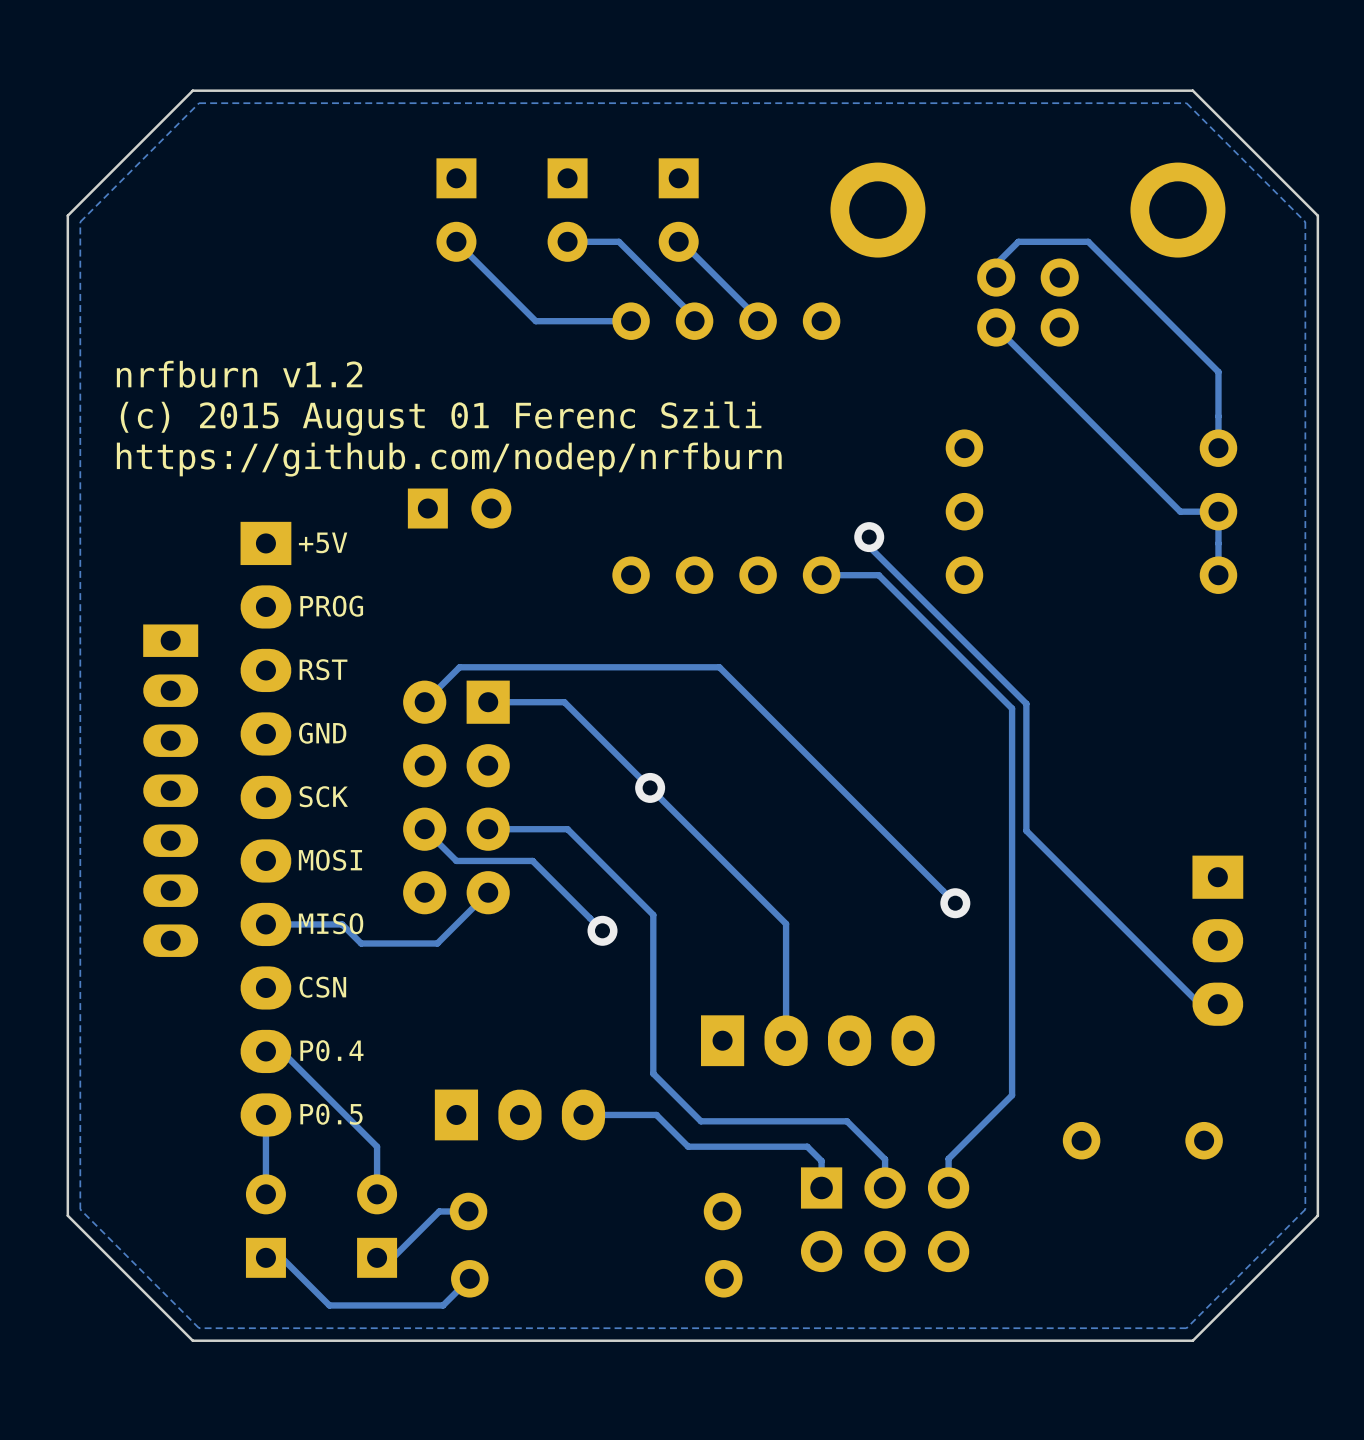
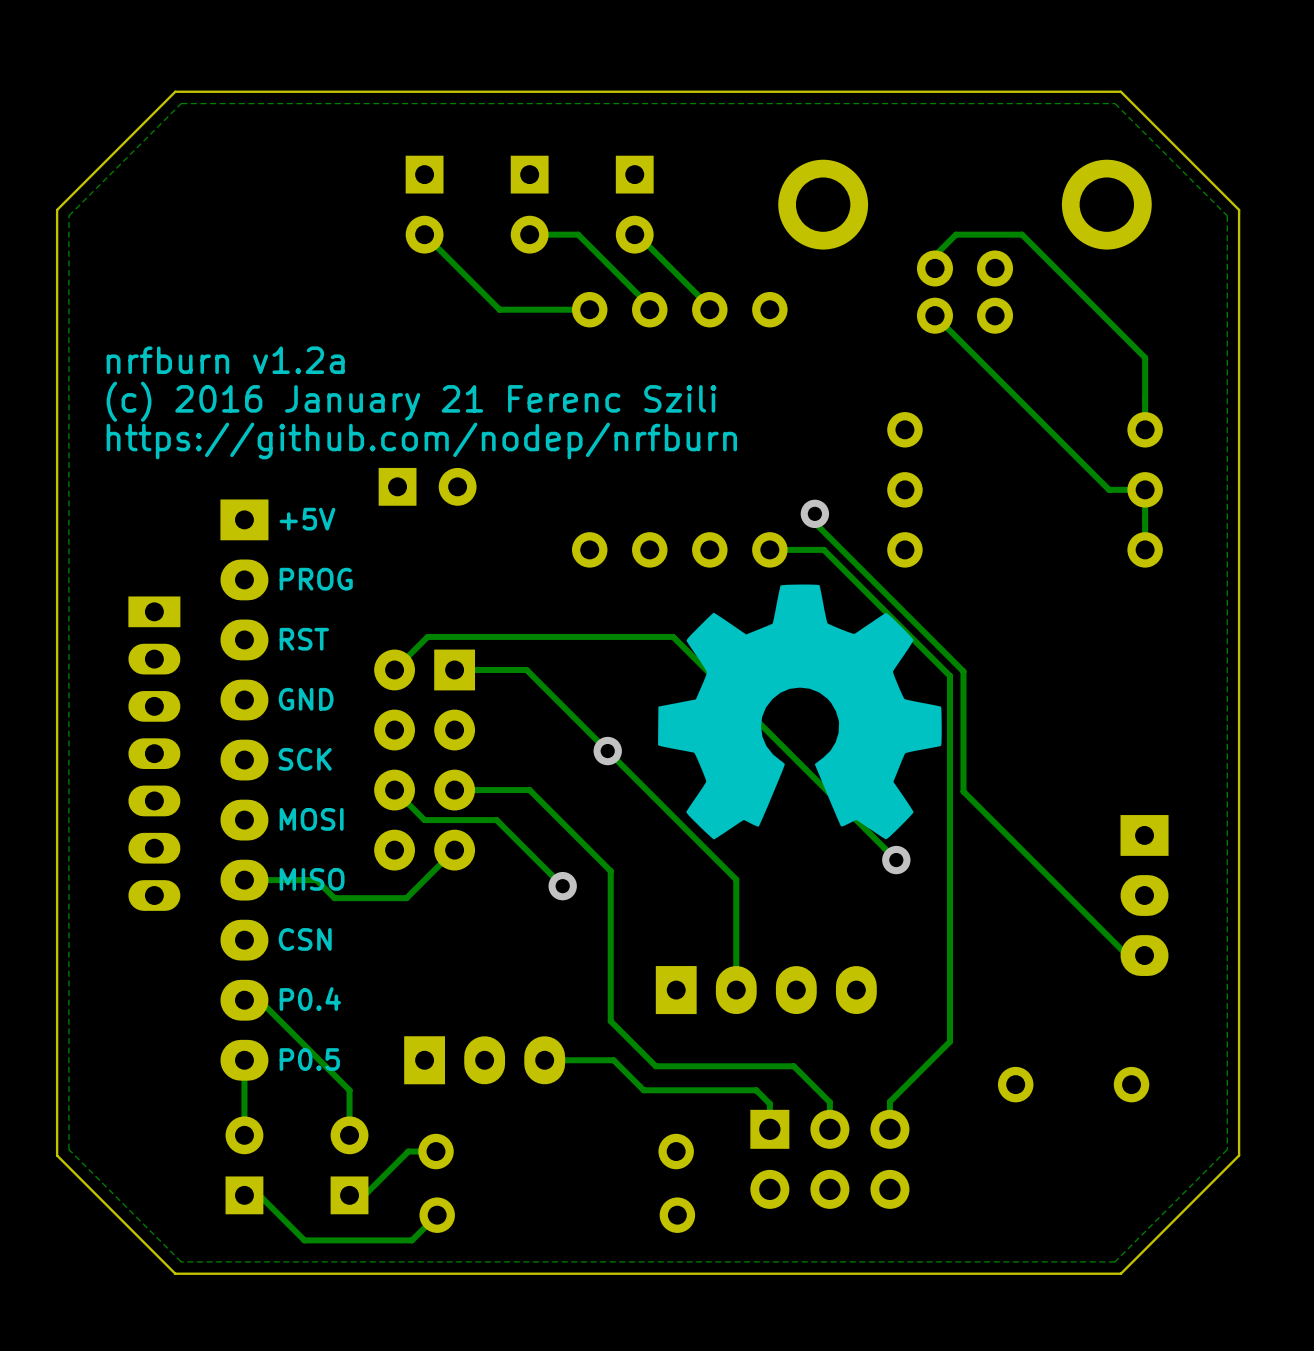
text: nrfburn v1.2 (239, 374) -> nrfburn v1.2a (225, 360)
text: (c) 2015 August 01 Ferenc Szili (441, 418) -> (c) 2016 January 21 Ferenc Szili (411, 401)
drawing: none -> [658, 584, 942, 840]

